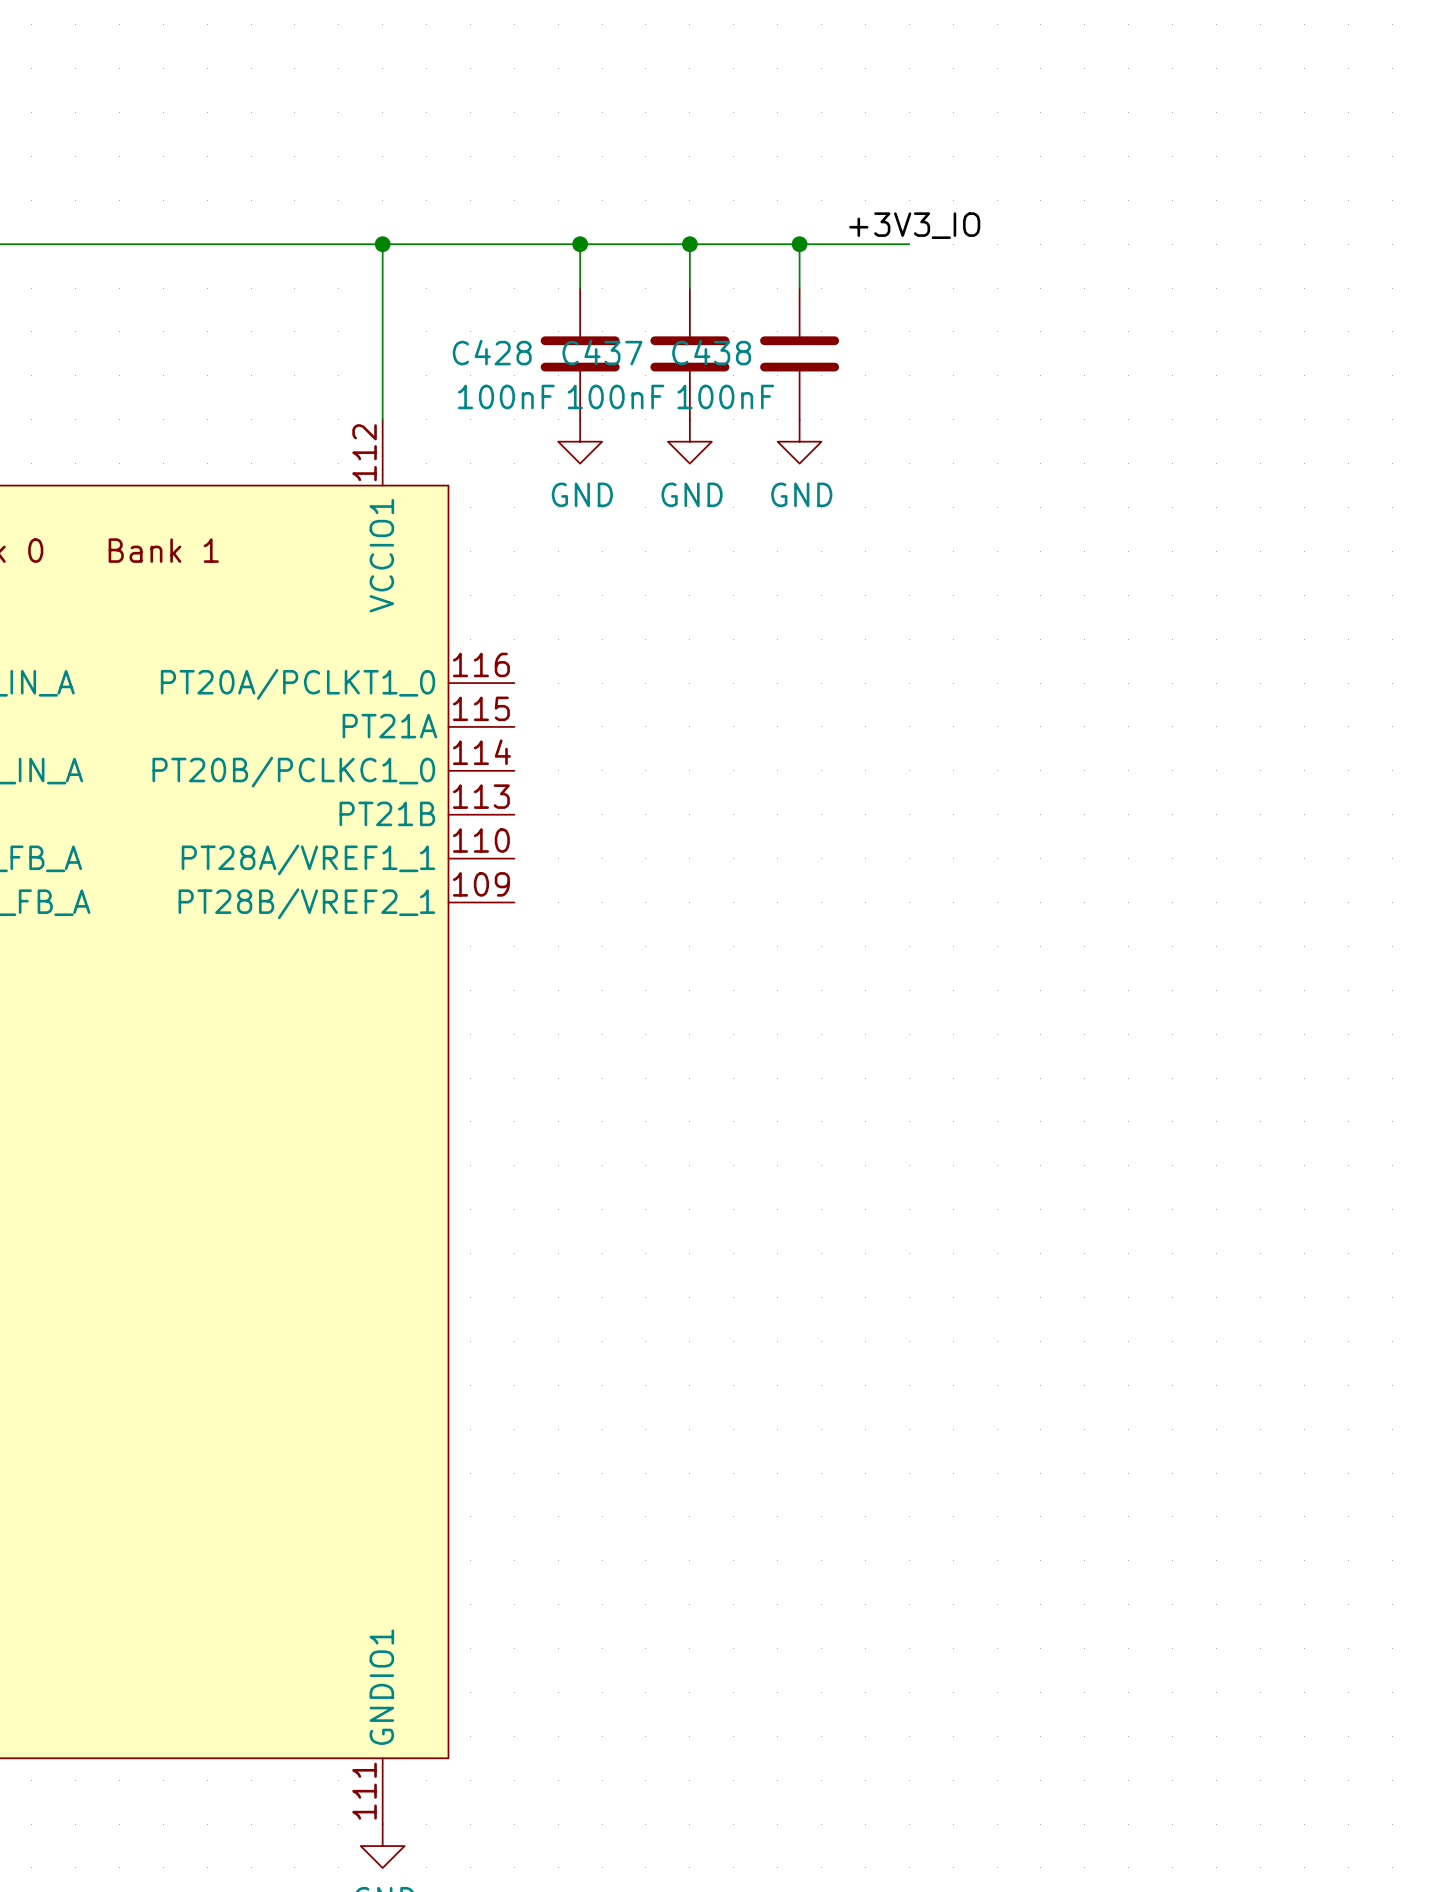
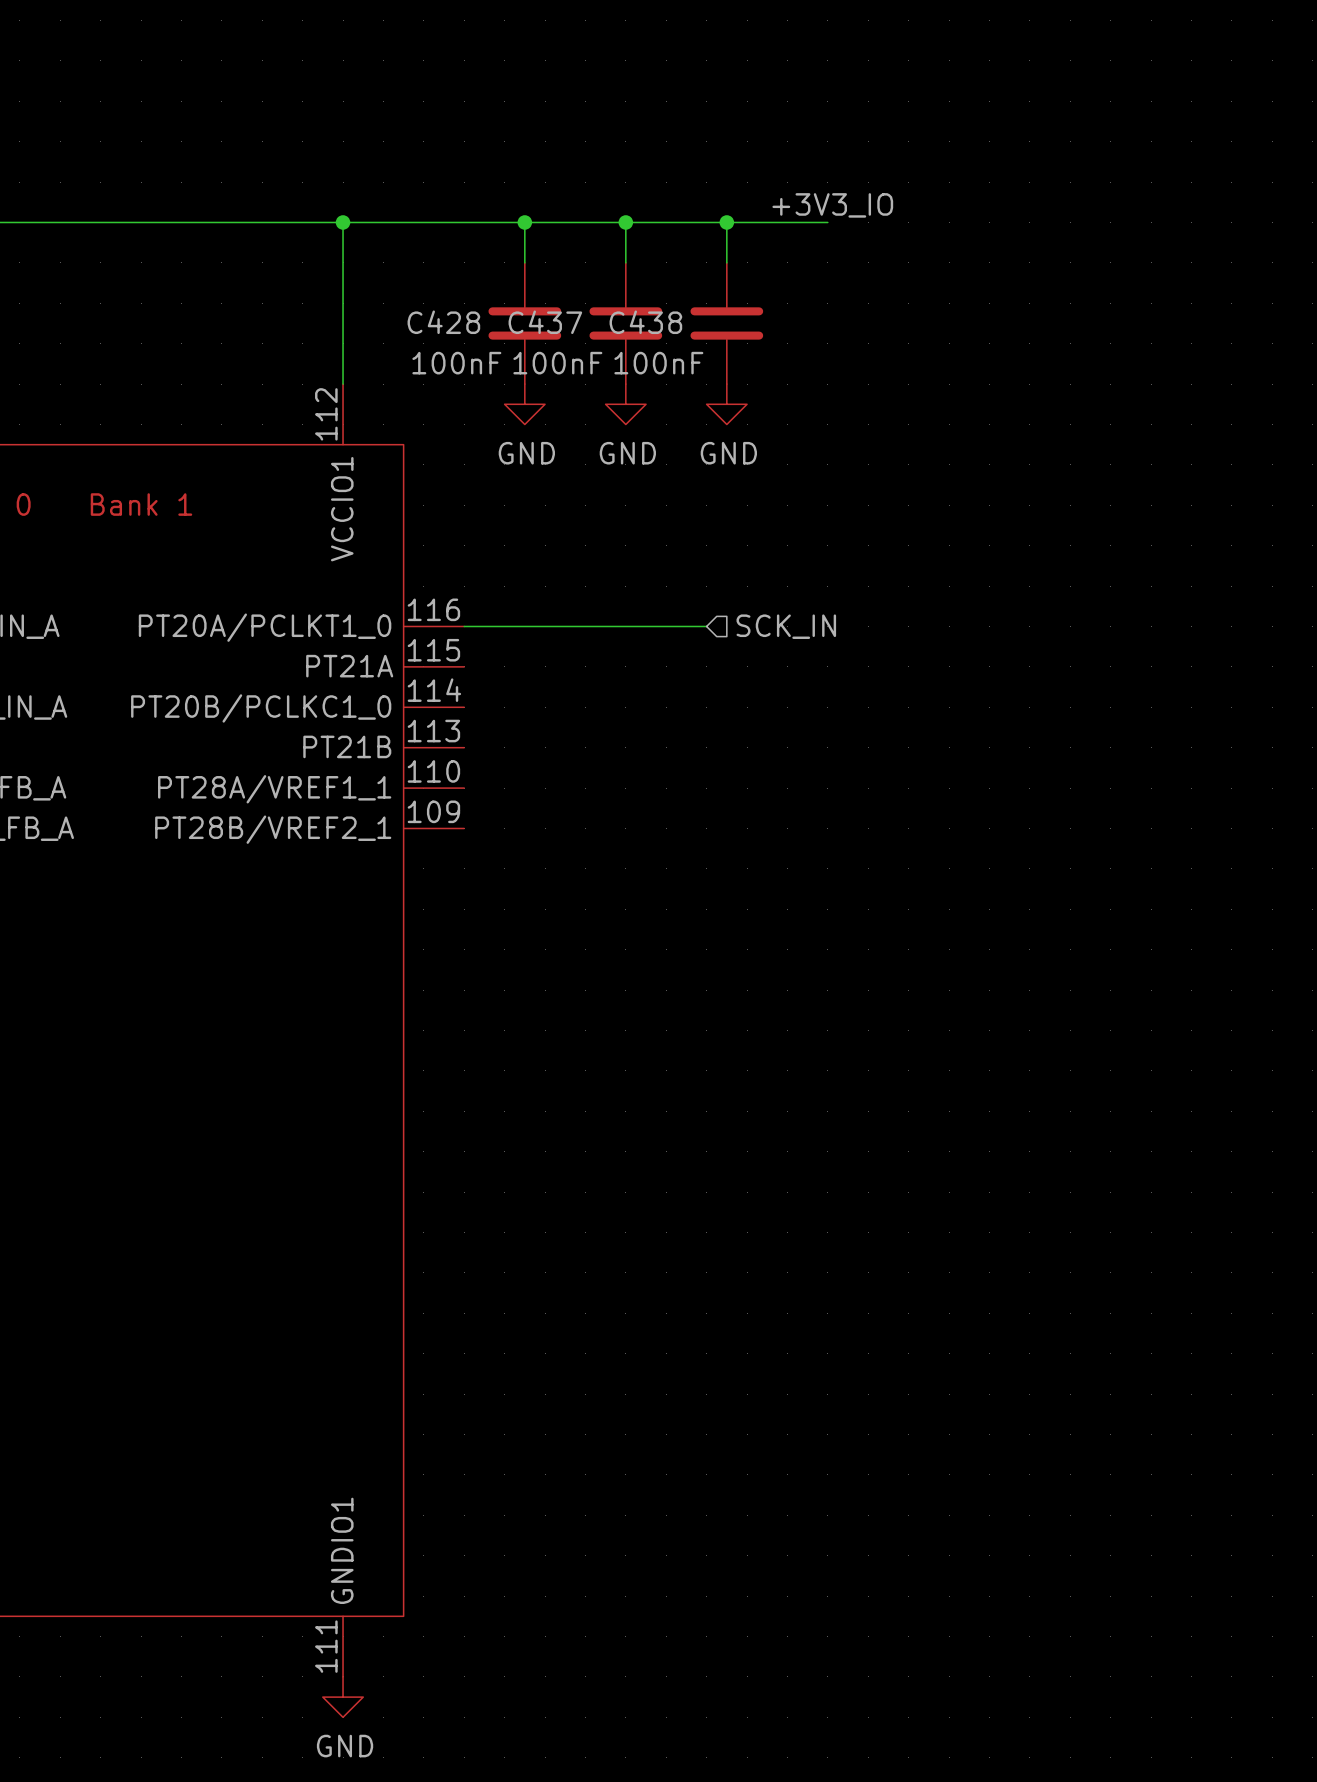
wire: none -> (464, 626) (706, 626)
hierarchical label: none -> SCK_IN (786, 626)

